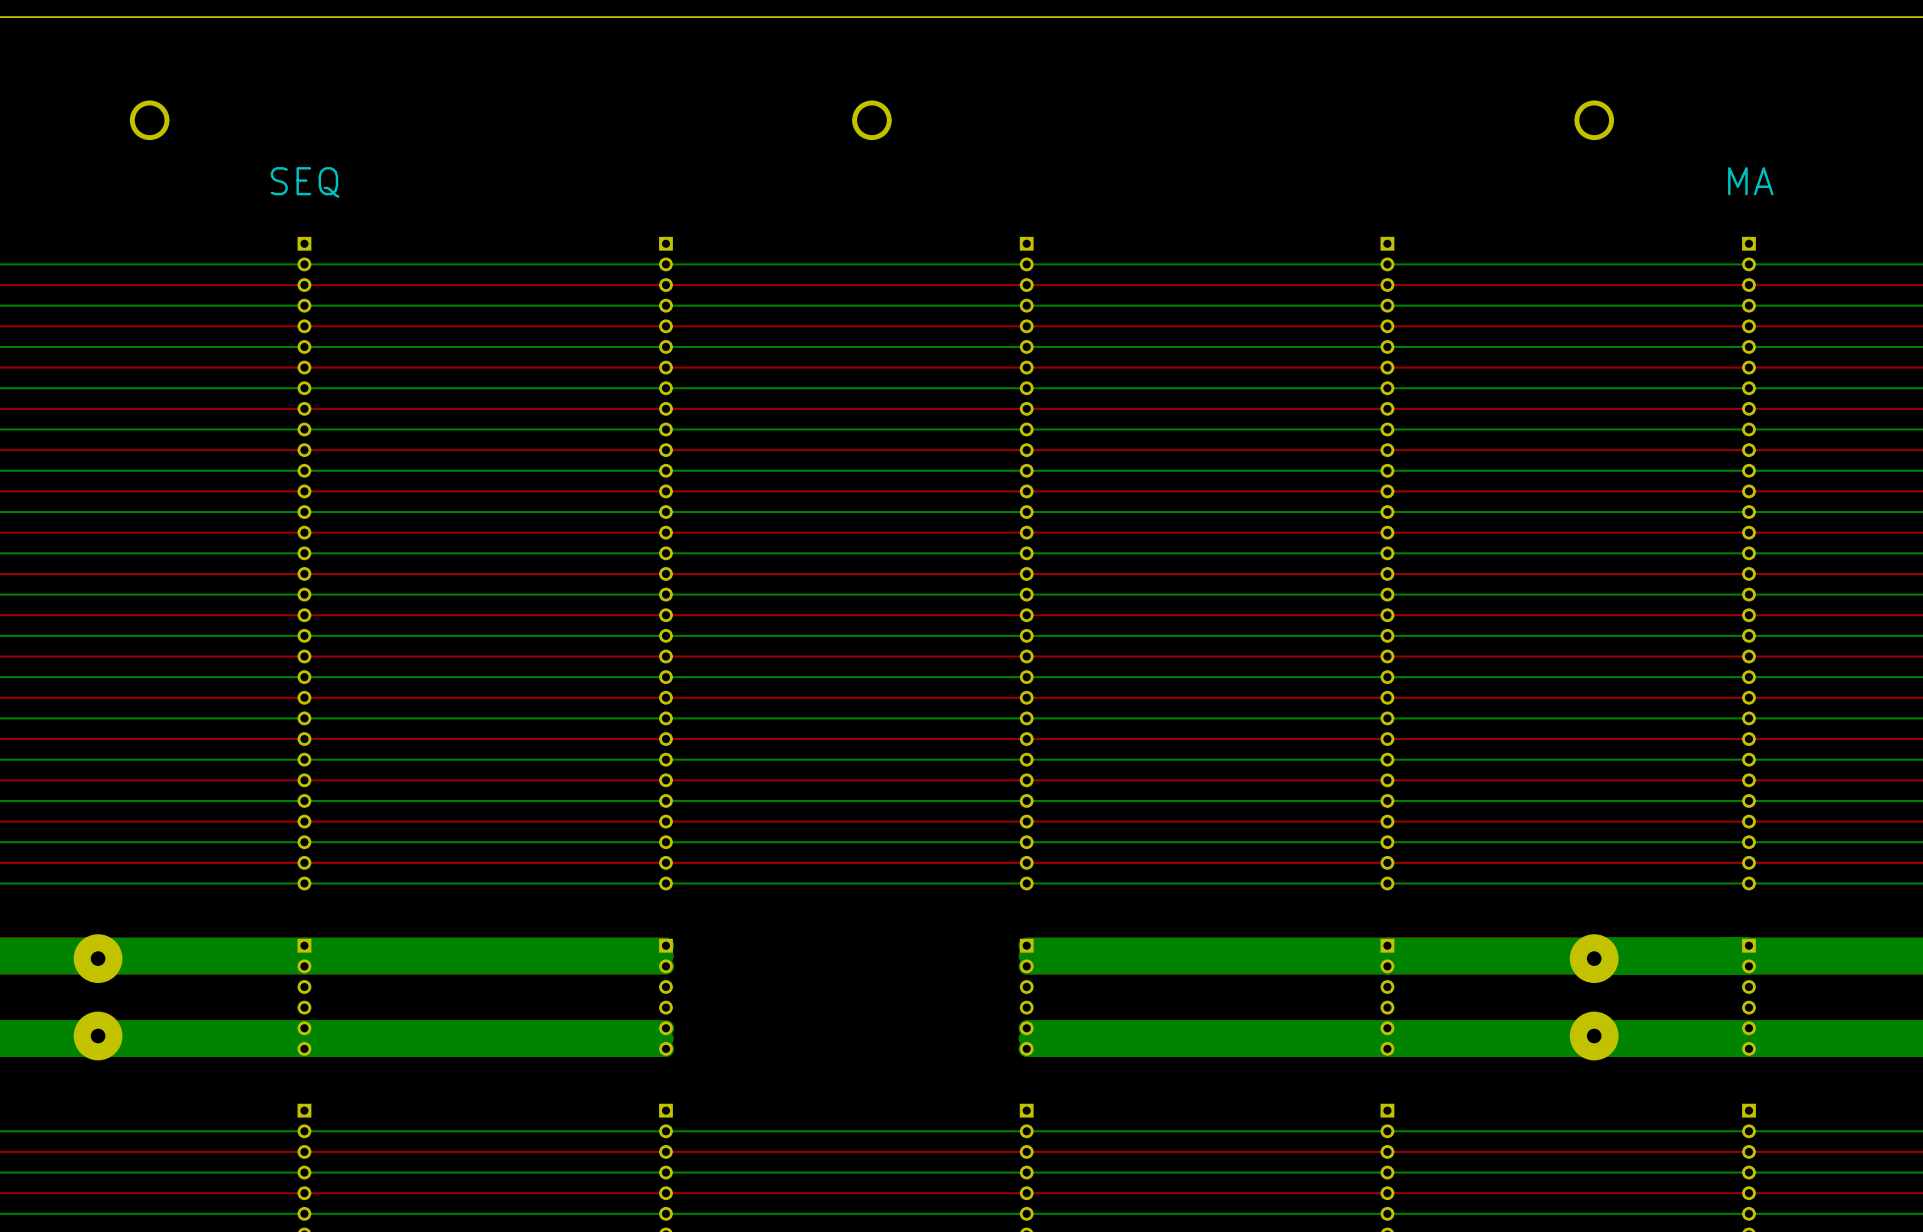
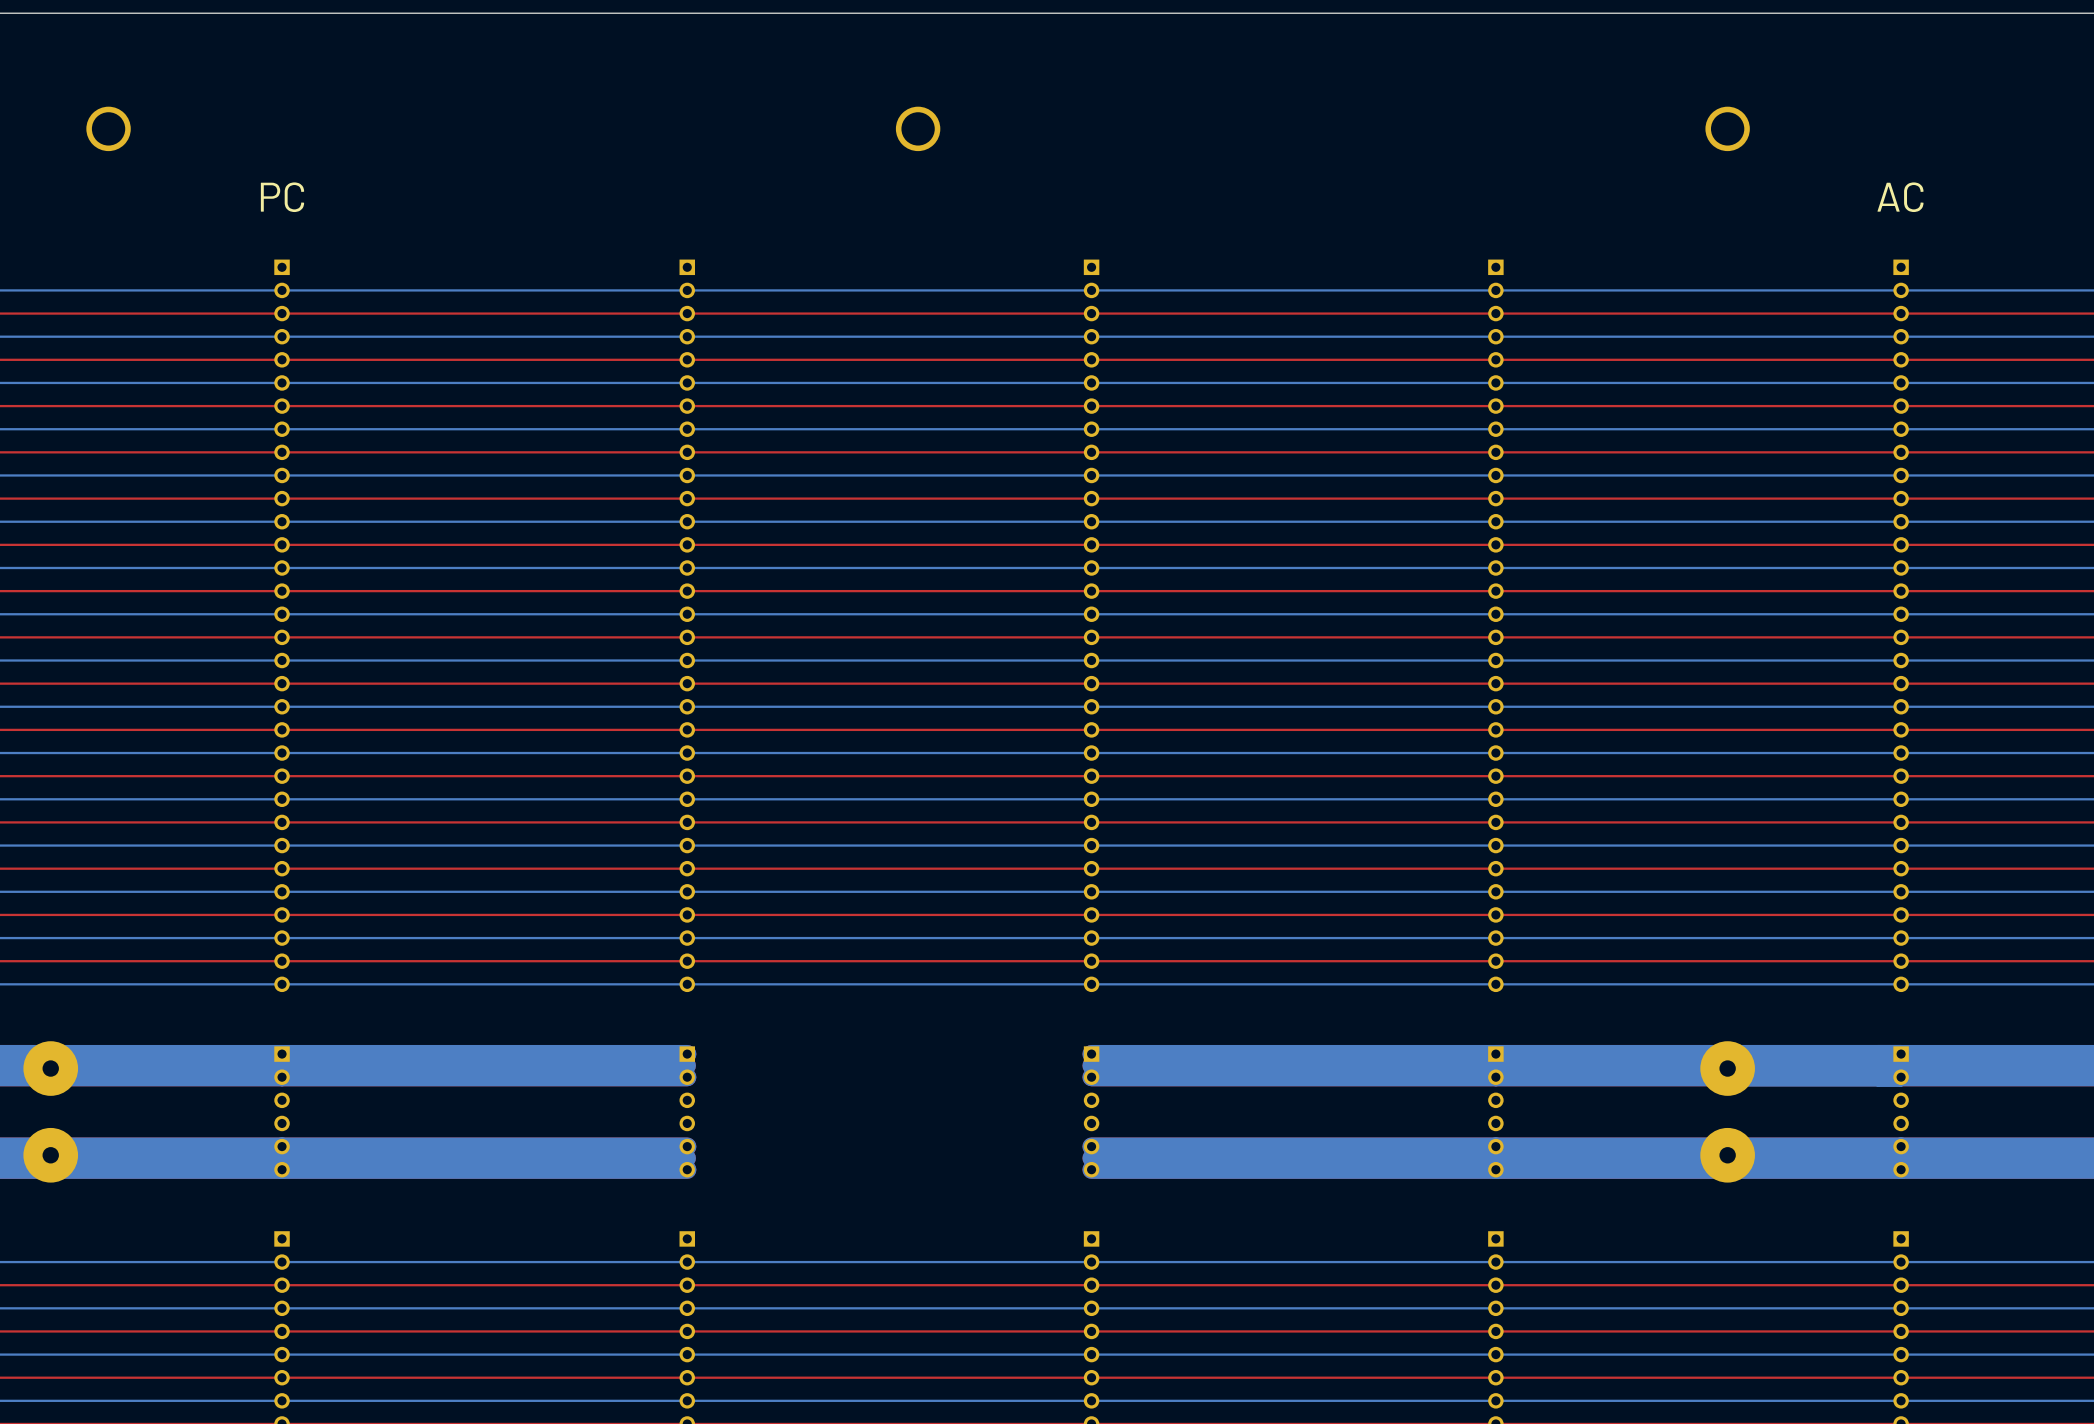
text: MA (1750, 181) -> AC (1900, 197)
text: SEQ (305, 182) -> PC (282, 197)

